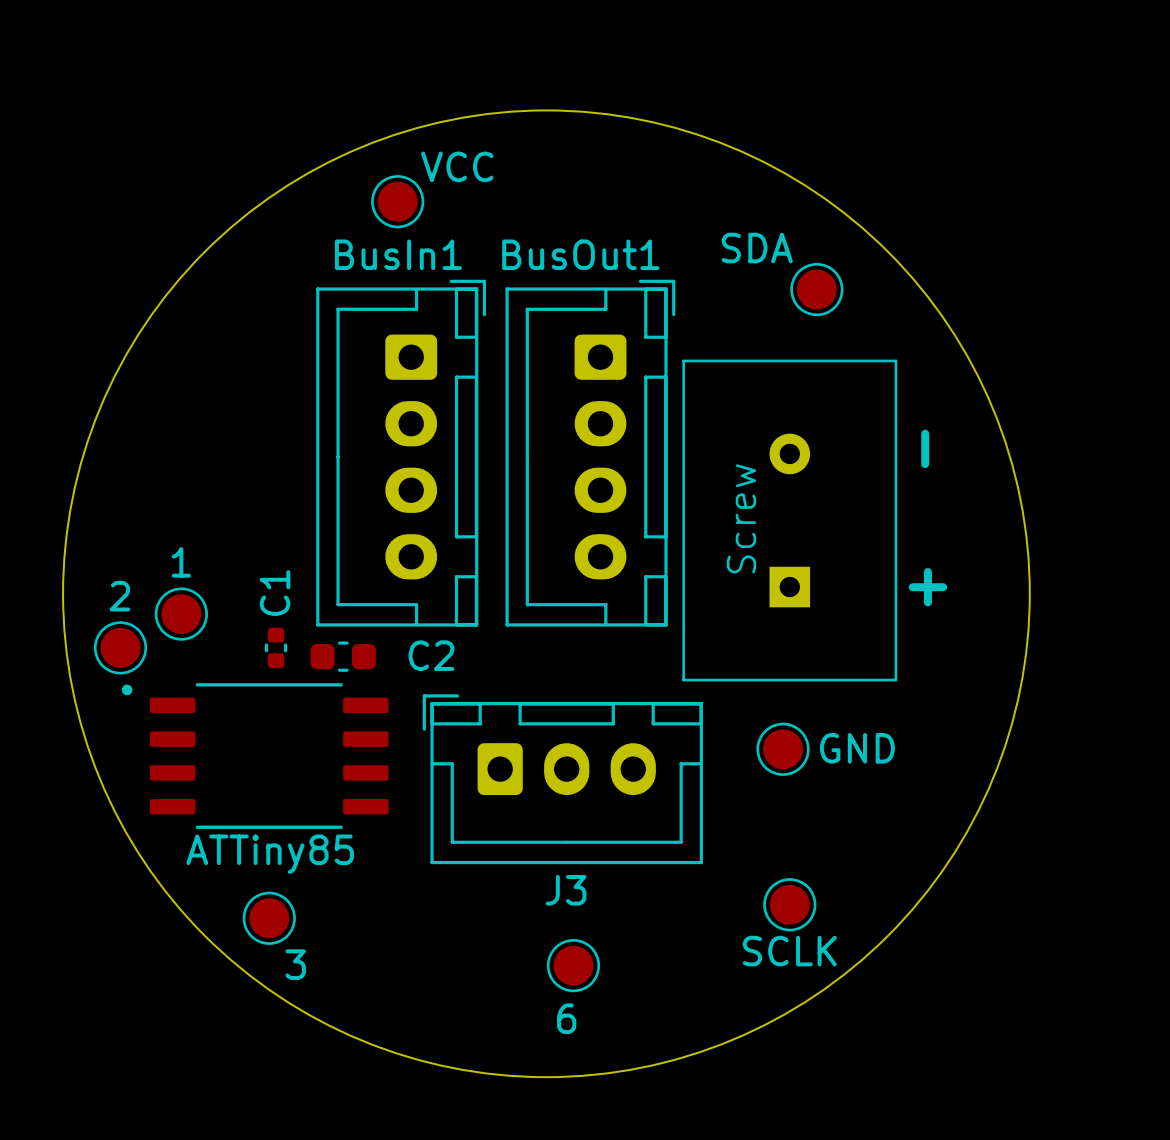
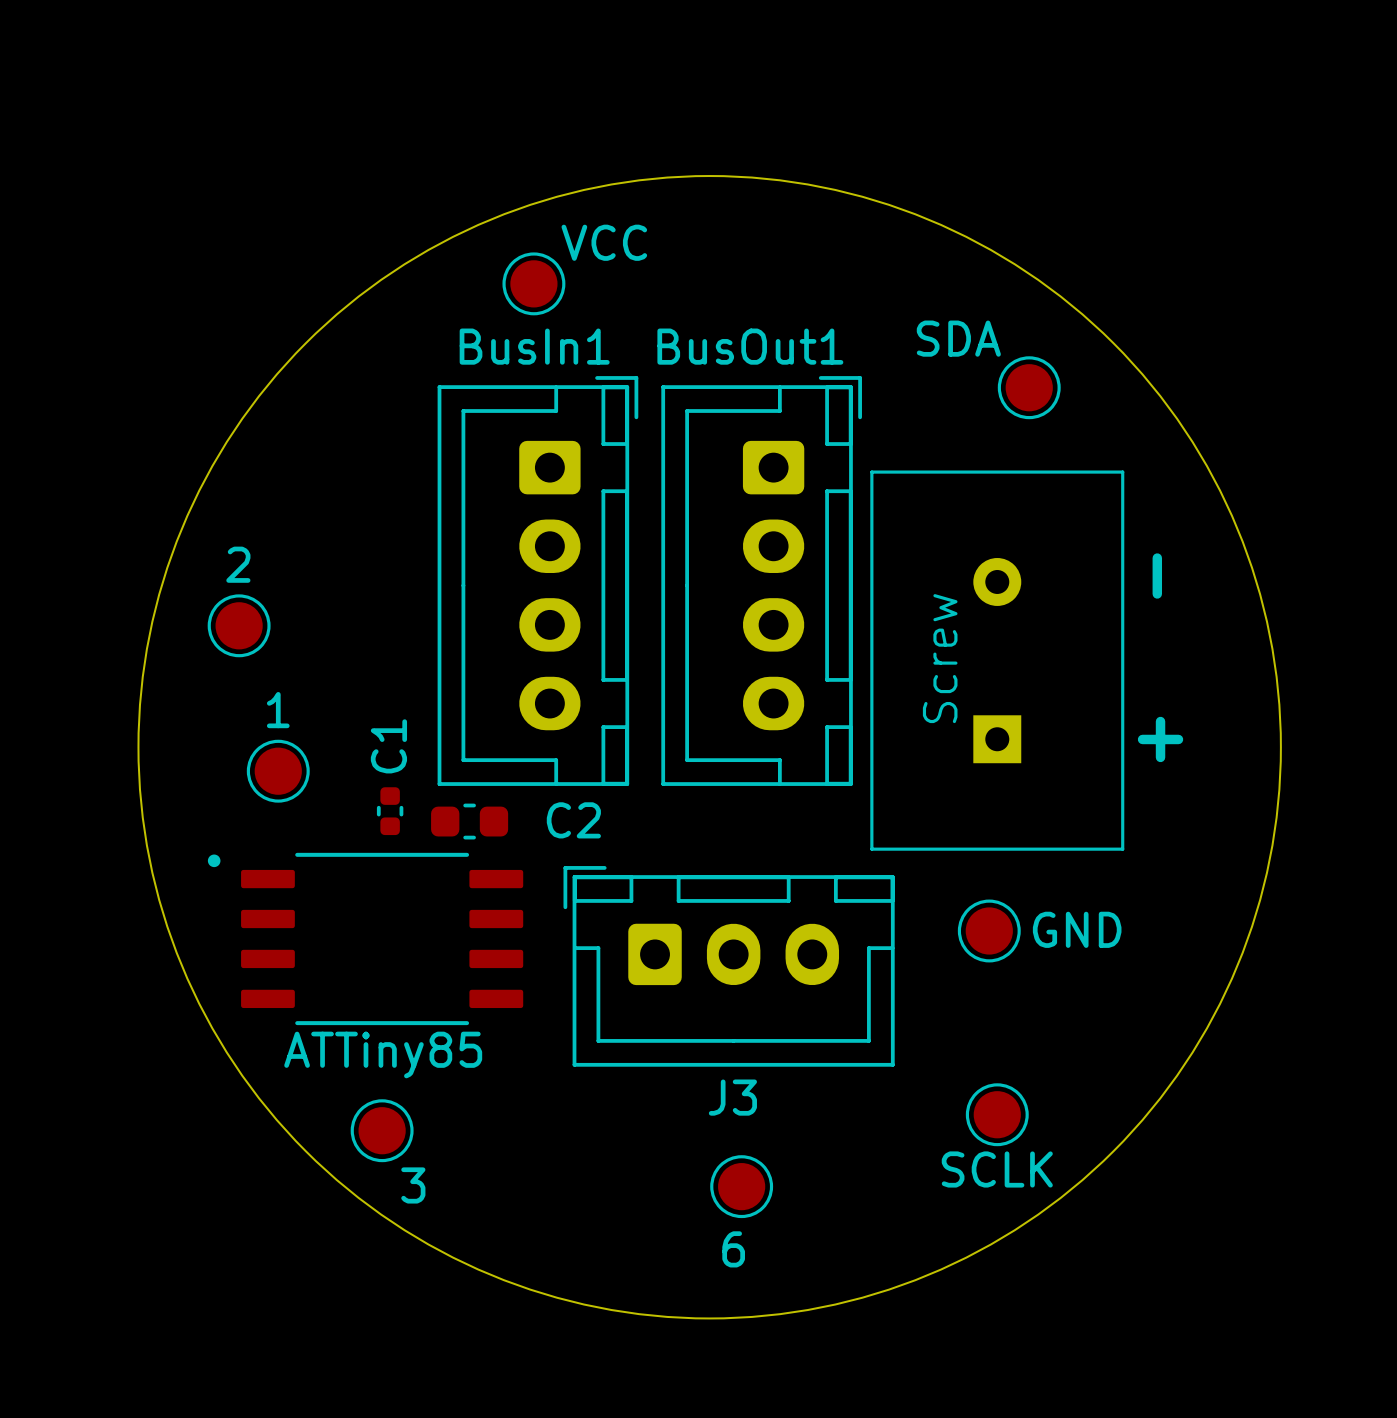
2 position: (120, 647) -> (239, 625)

